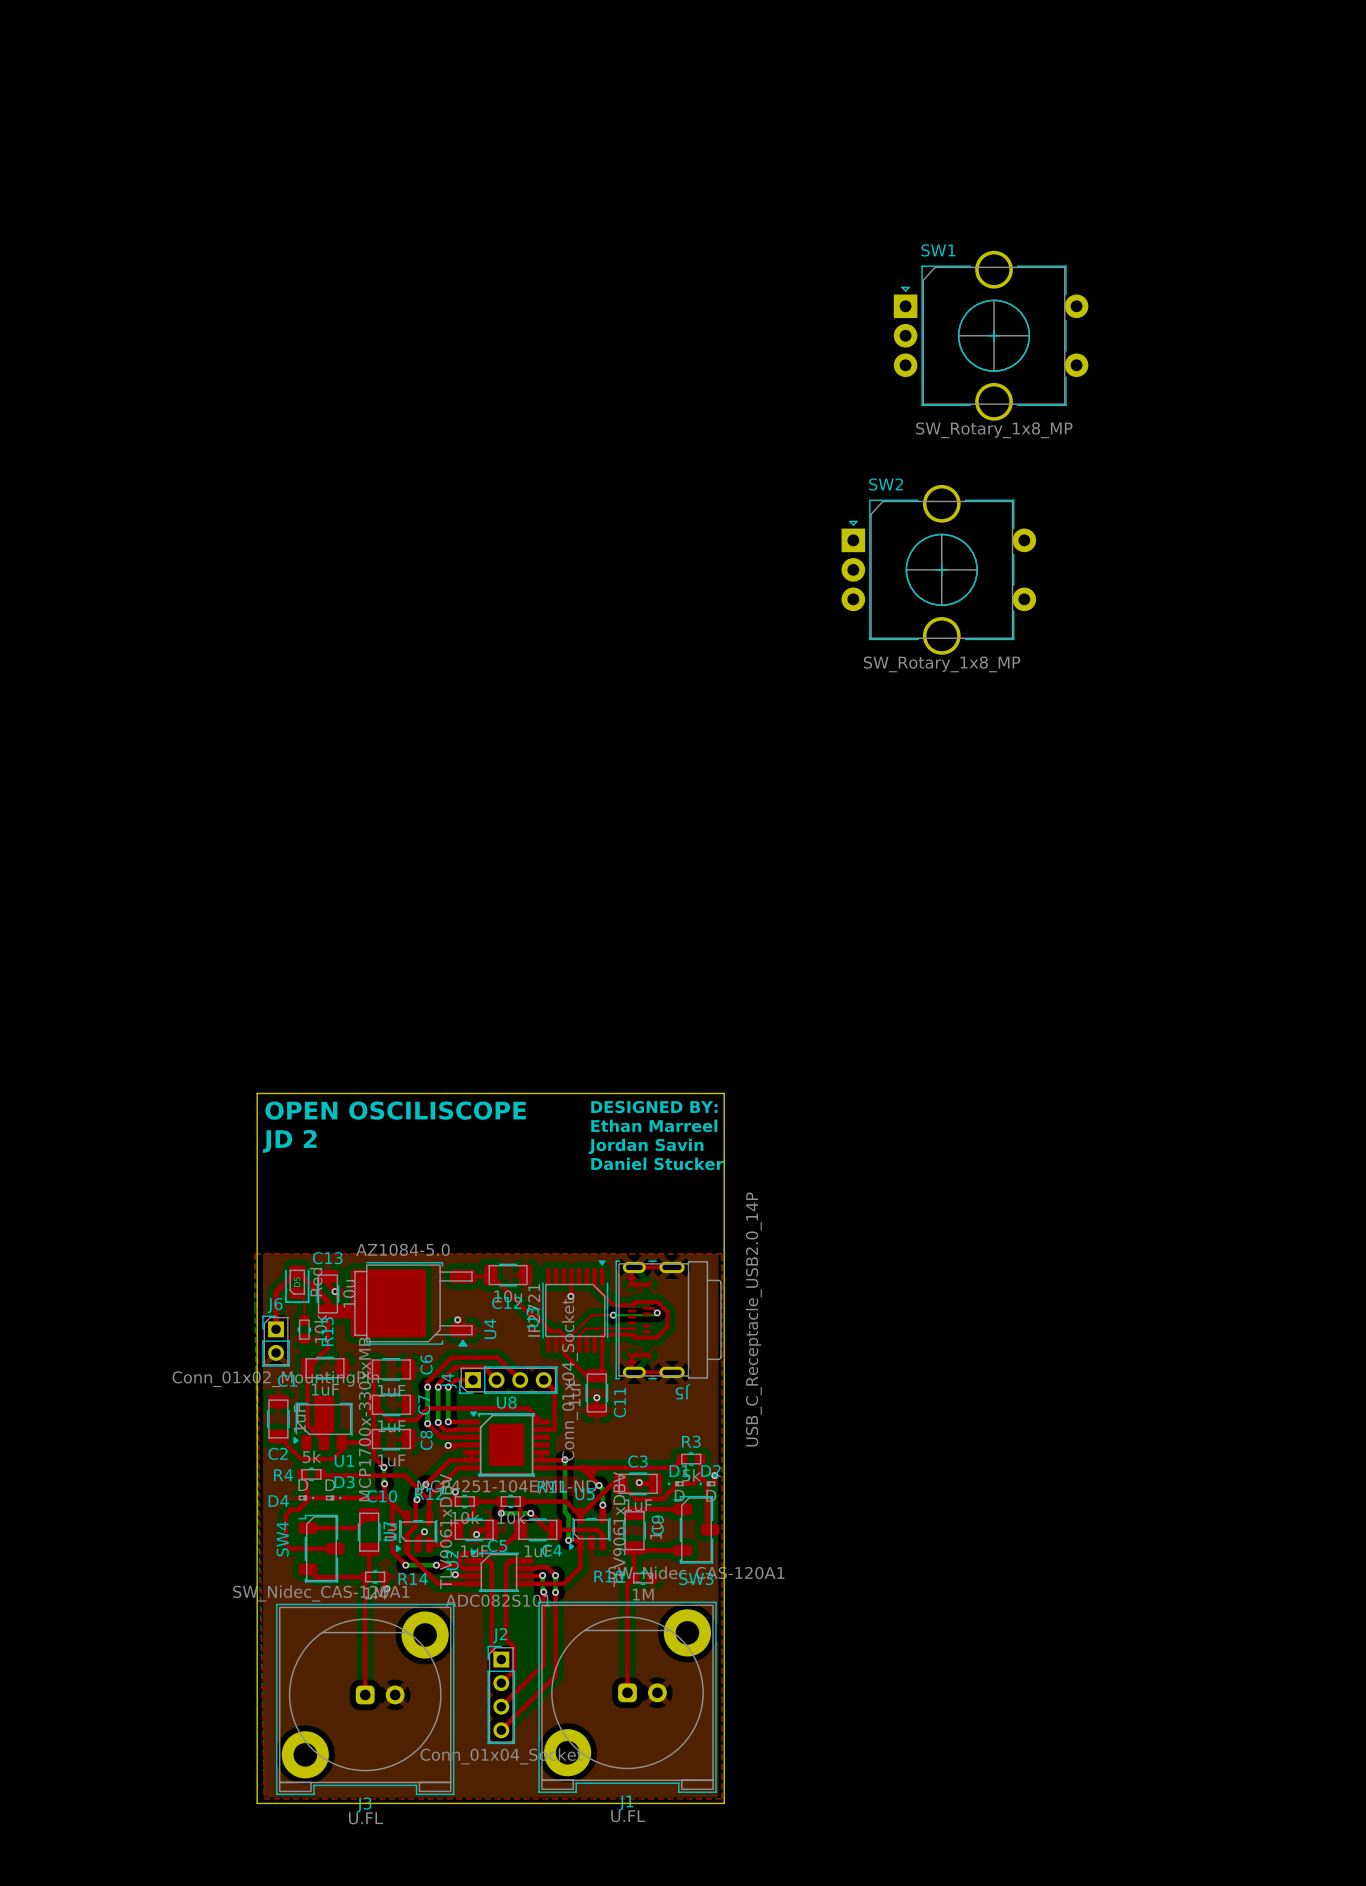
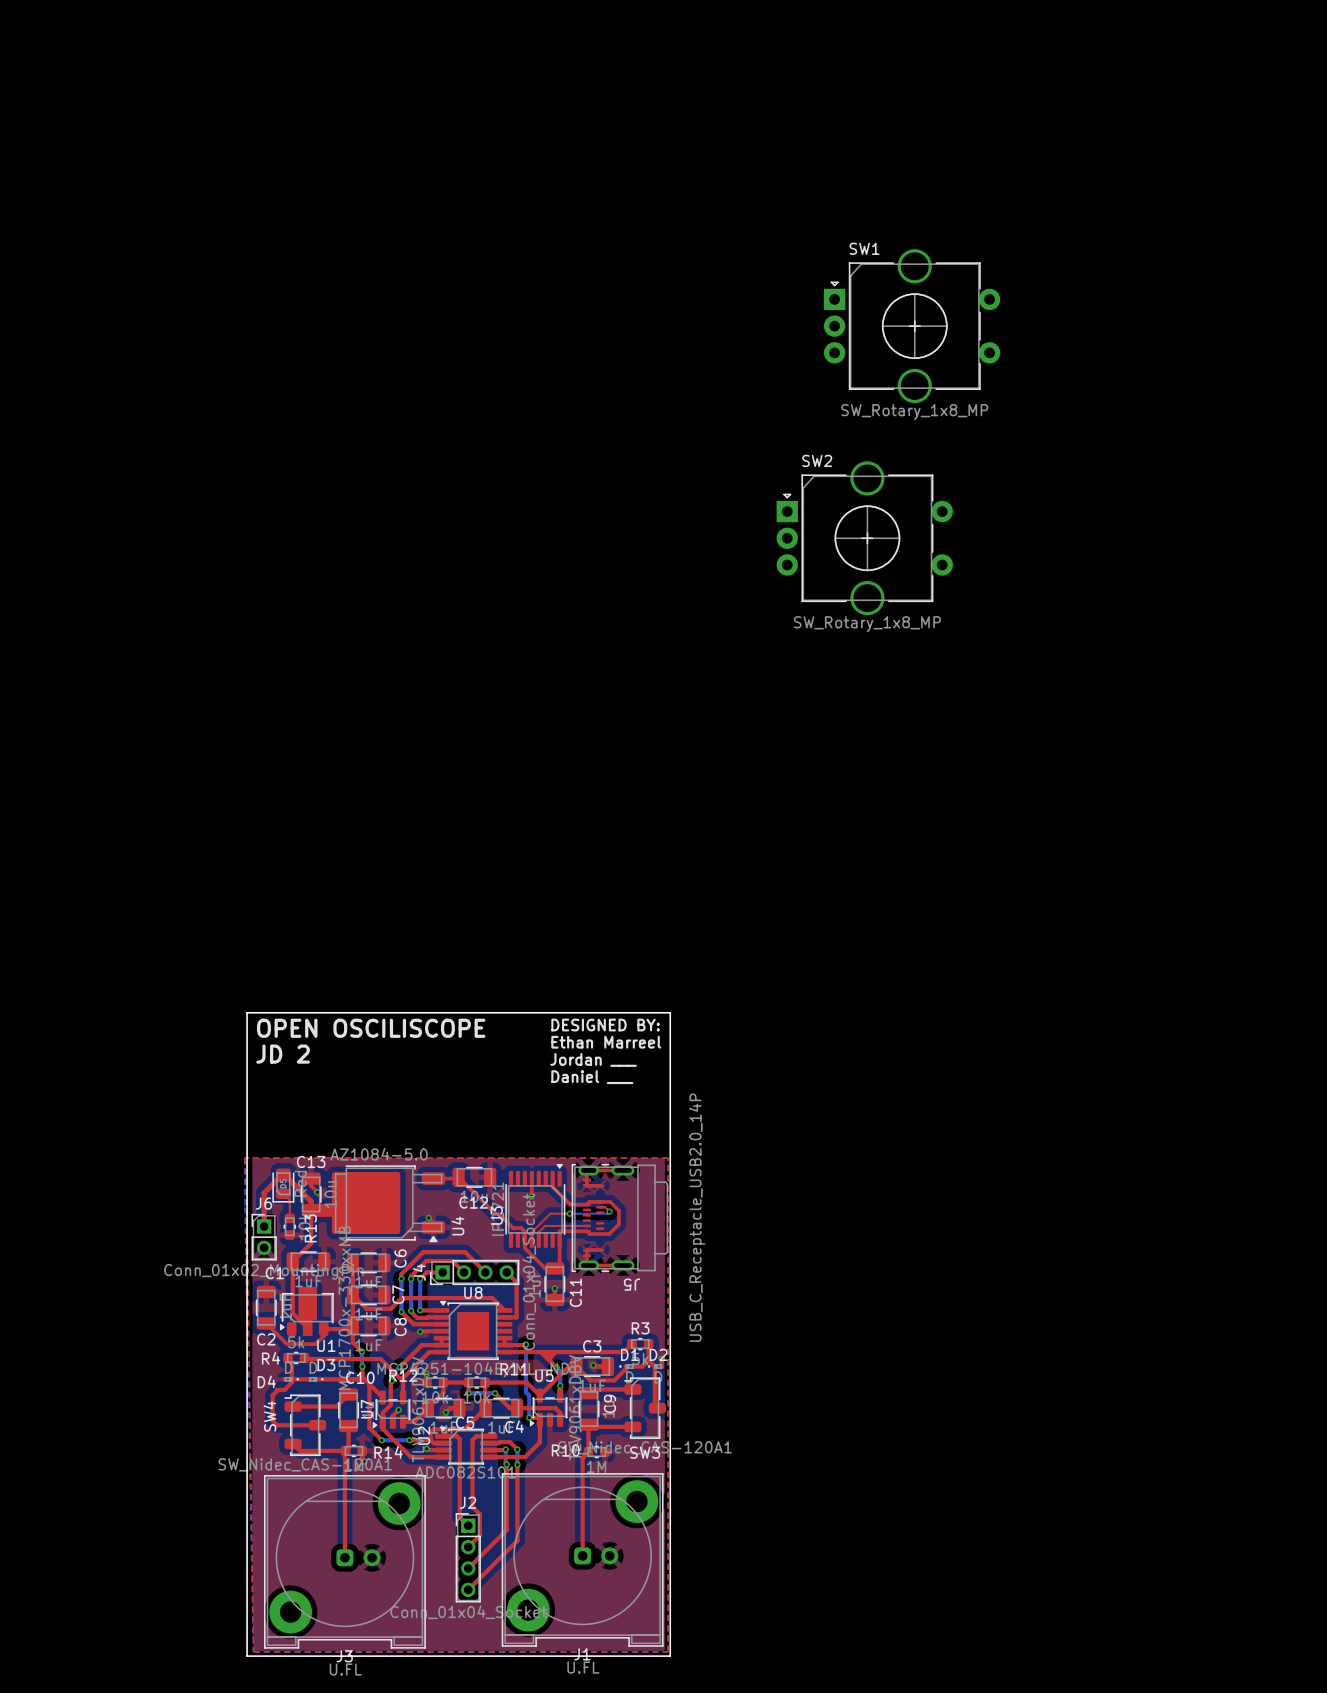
text: Jordan Savin (646, 1146) -> Jordan ___ (593, 1059)
text: Daniel Stucker (657, 1163) -> Daniel ___ (592, 1077)

